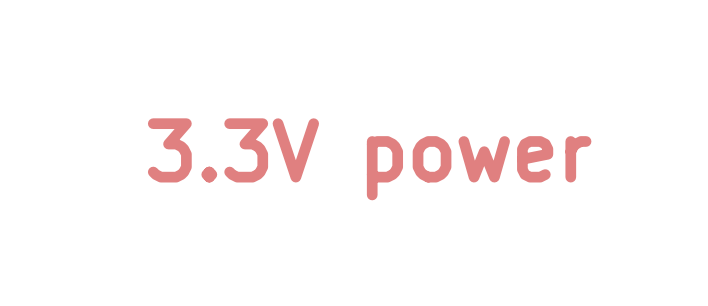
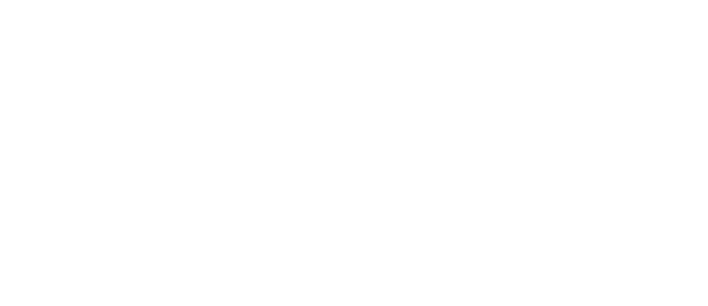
text: 3.3V power (369, 159) -> none

